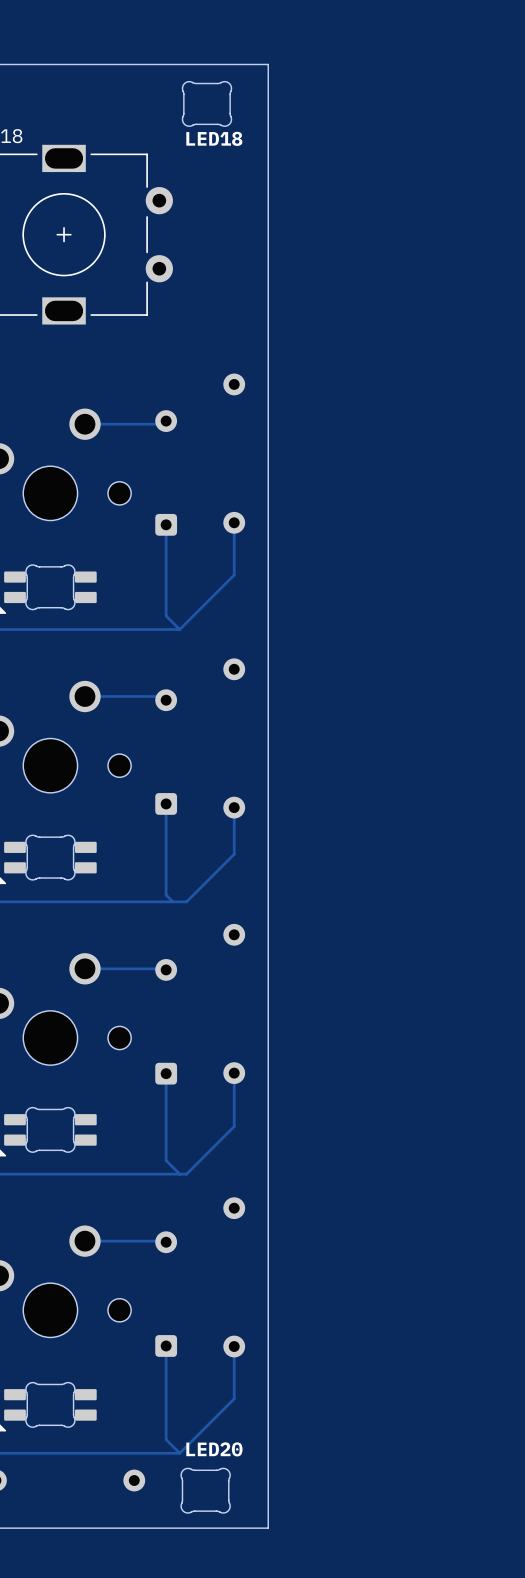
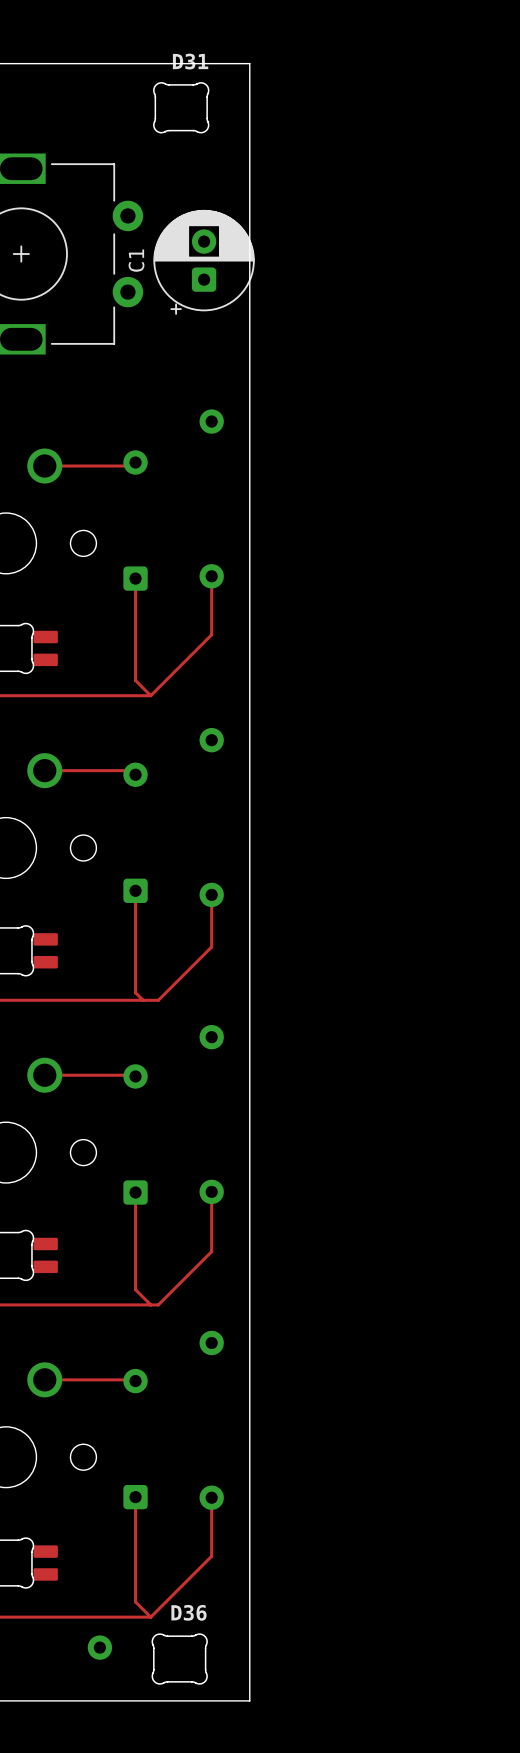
LED18 name: LED18 (214, 138) -> D31 (190, 61)
C1: none -> (204, 262)
LED20 name: LED20 (214, 1449) -> D36 (188, 1612)

